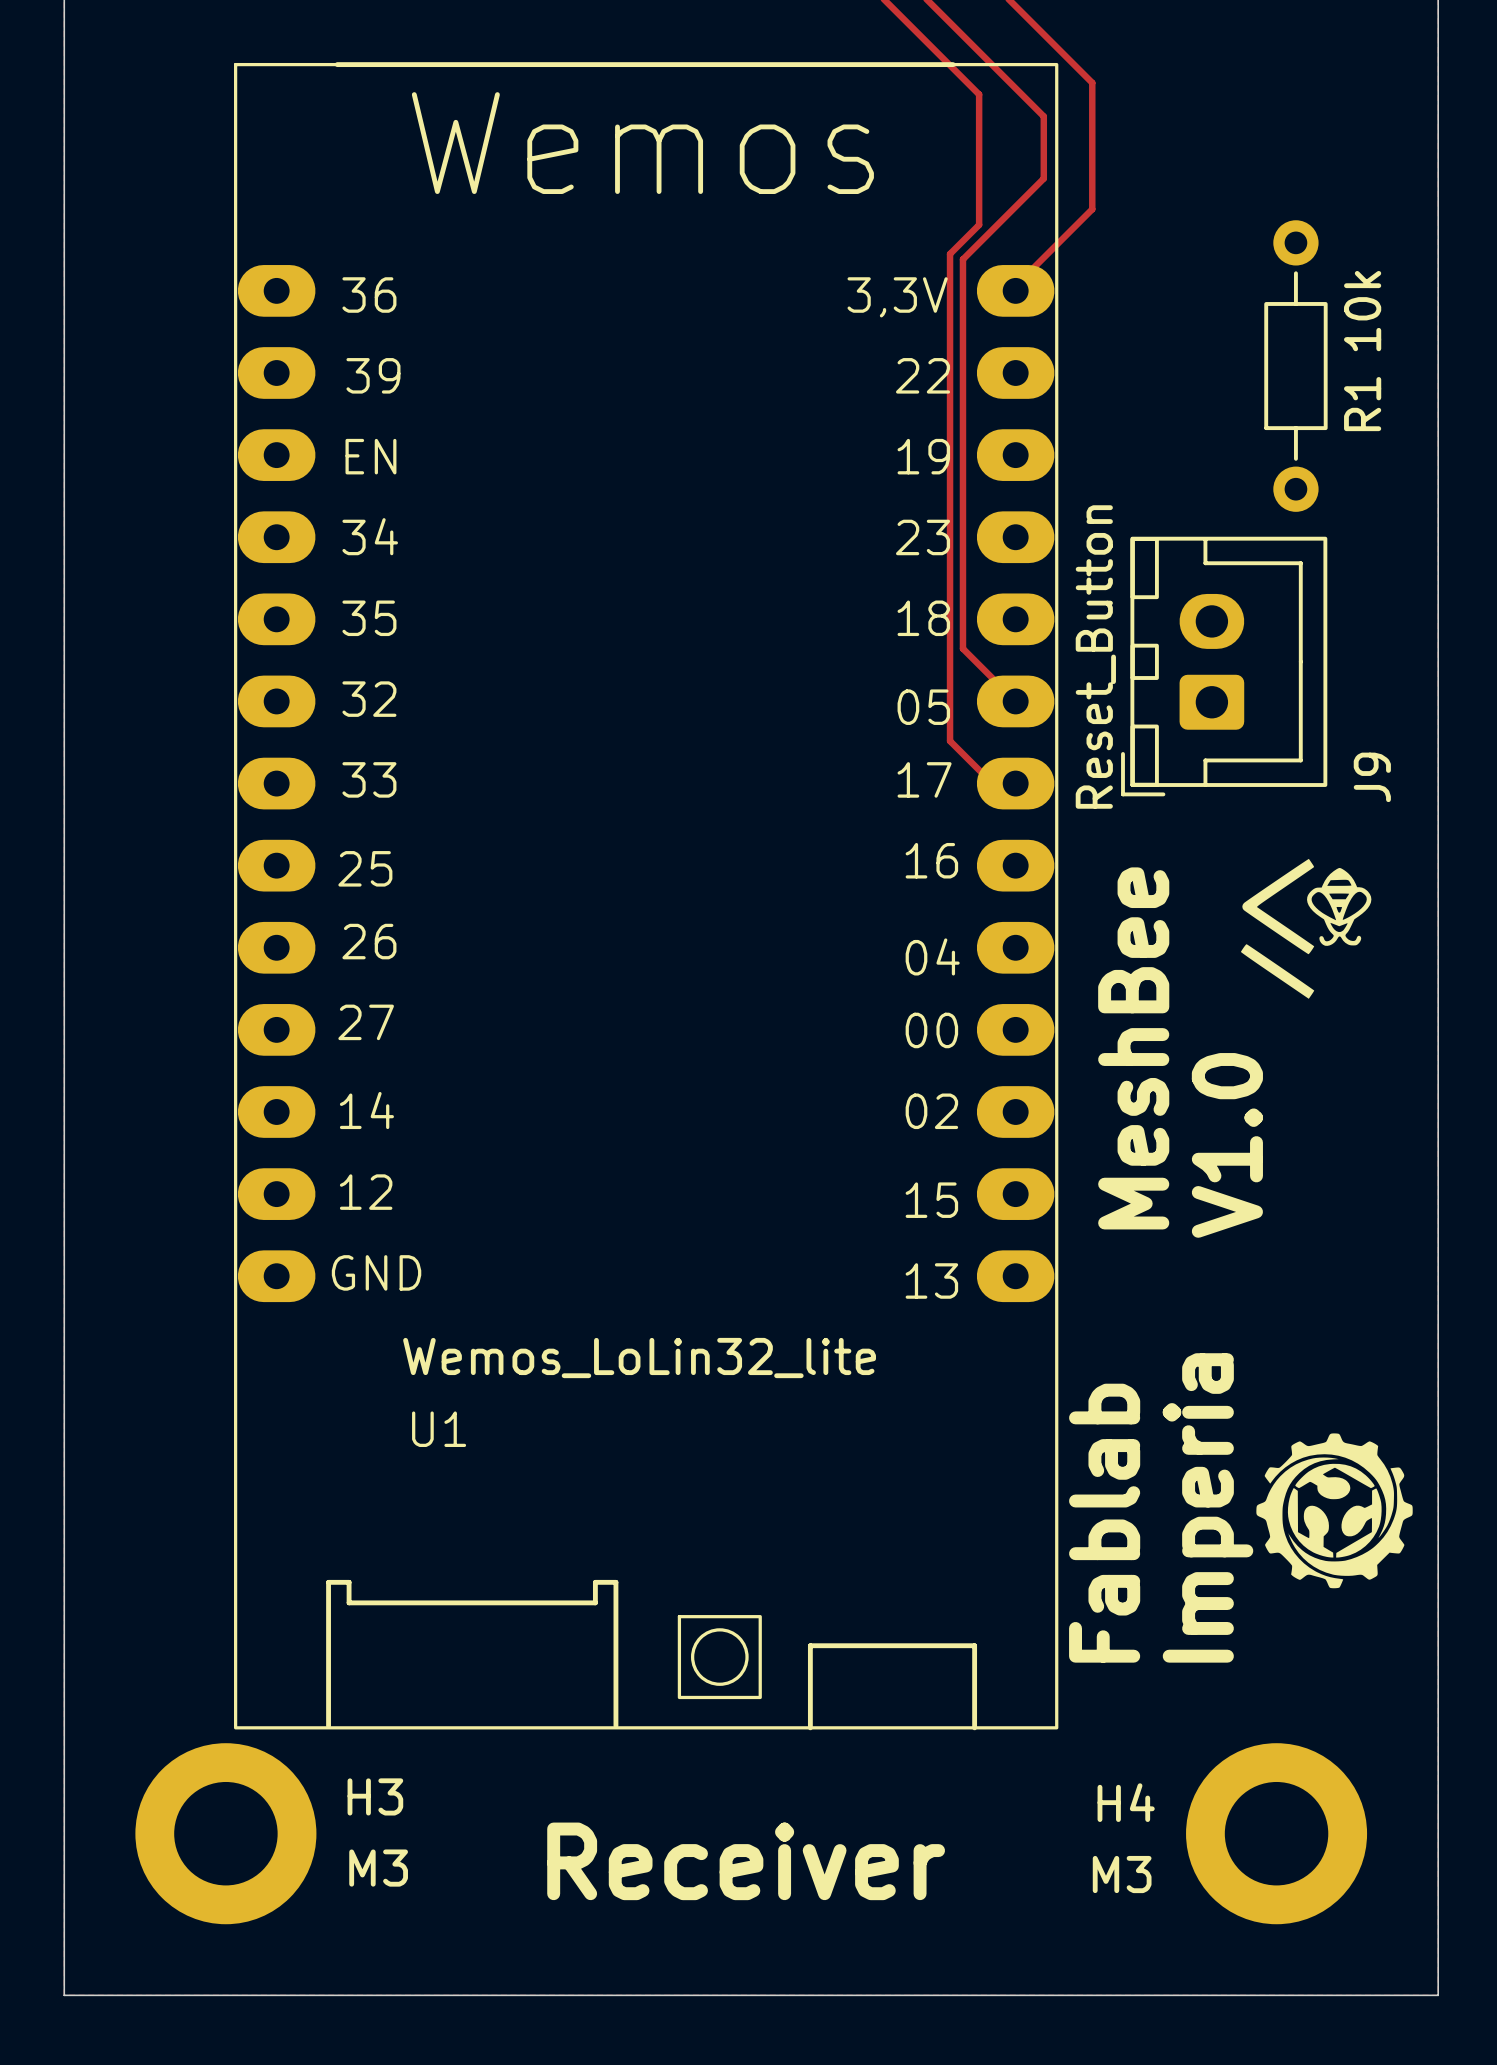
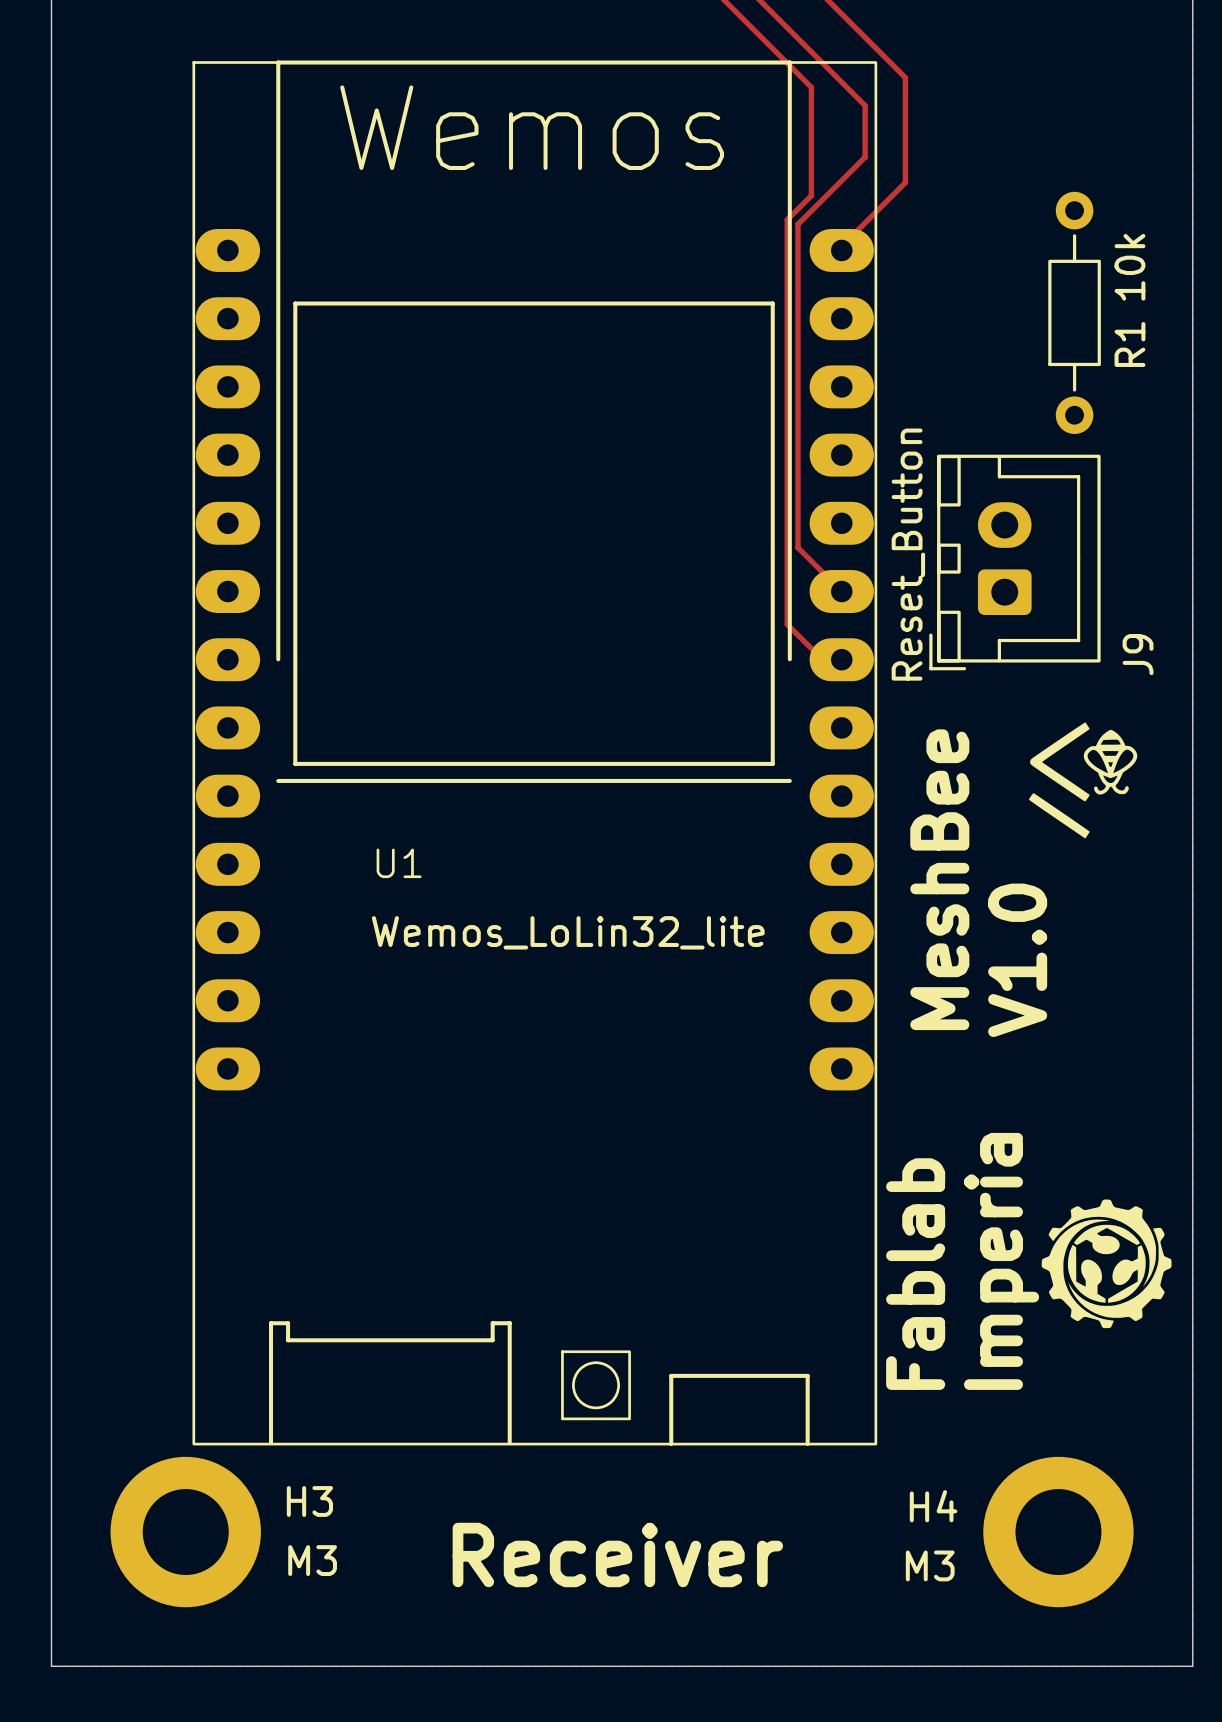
U1 footprint: [233, 62, 1059, 1731] -> [192, 60, 878, 1447]
U1 value position: Wemos_LoLin32_lite (639, 1358) -> Wemos_LoLin32_lite (568, 932)
U1 name position: U1 (439, 1429) -> U1 (399, 863)

